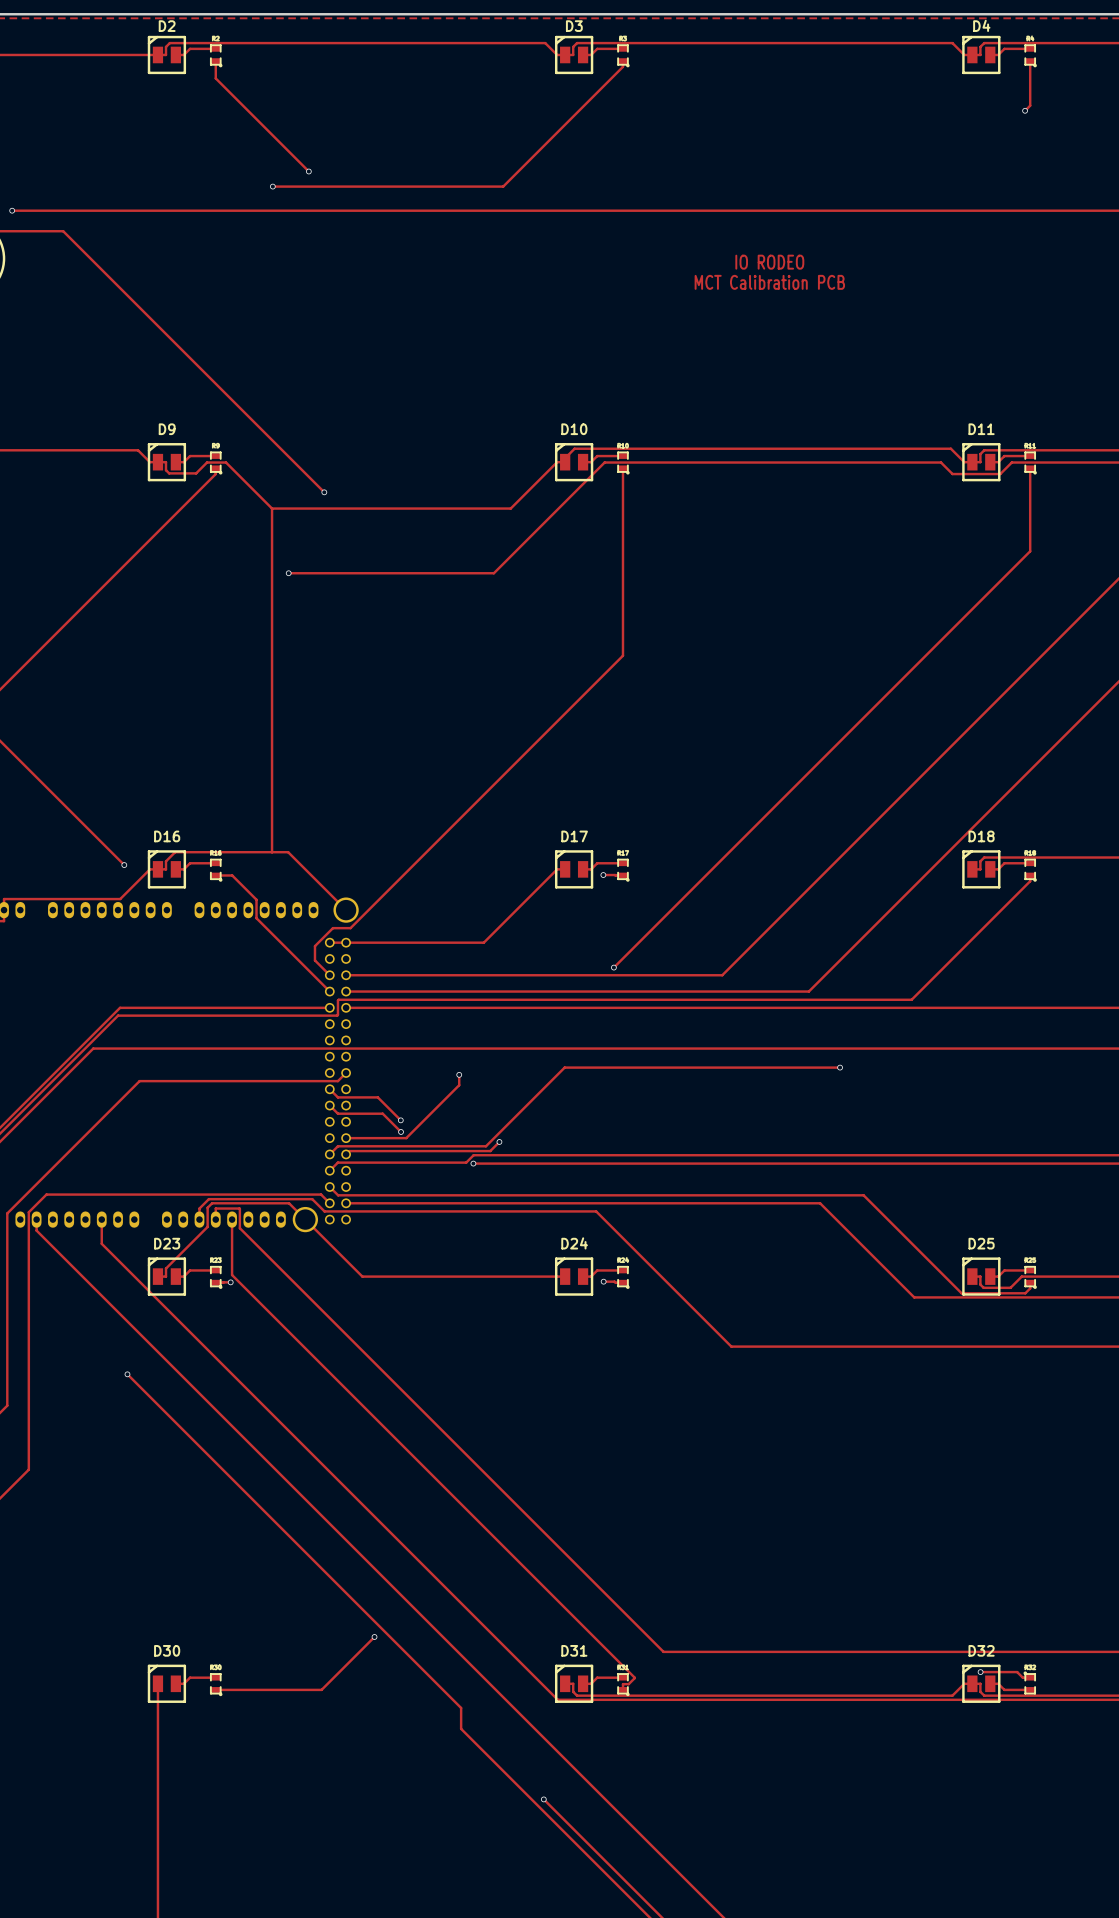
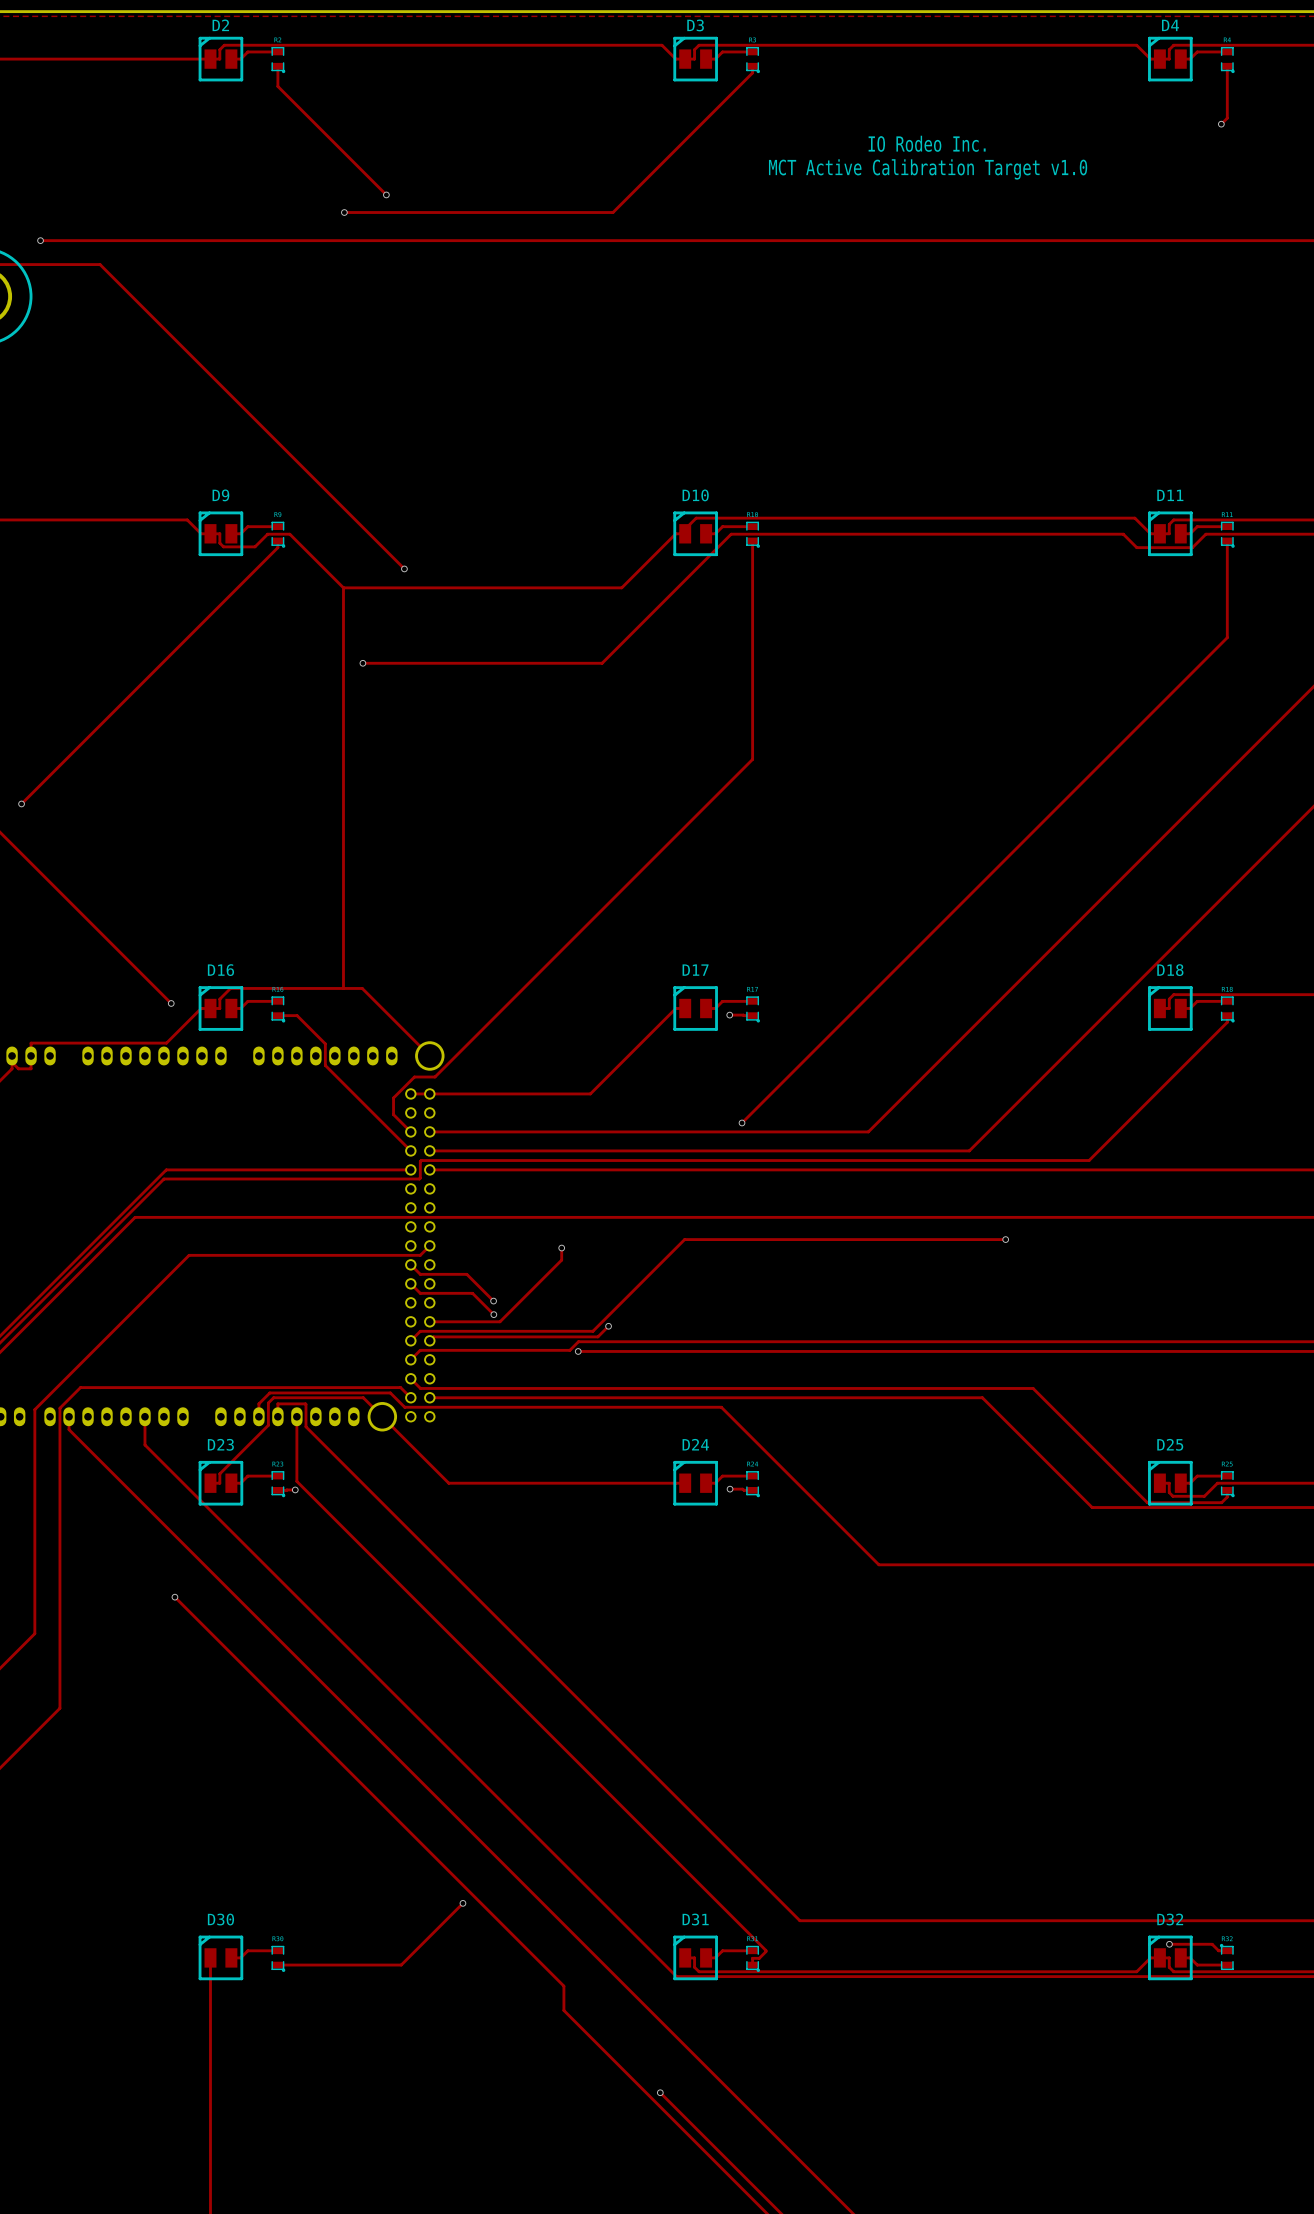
text: none -> IO Rodeo Inc. (927, 143)
text: none -> MCT Active Calibration Target v1.0 (928, 169)
text: IO RODEO (769, 262) -> none
text: MCT Calibration PCB (769, 282) -> none

